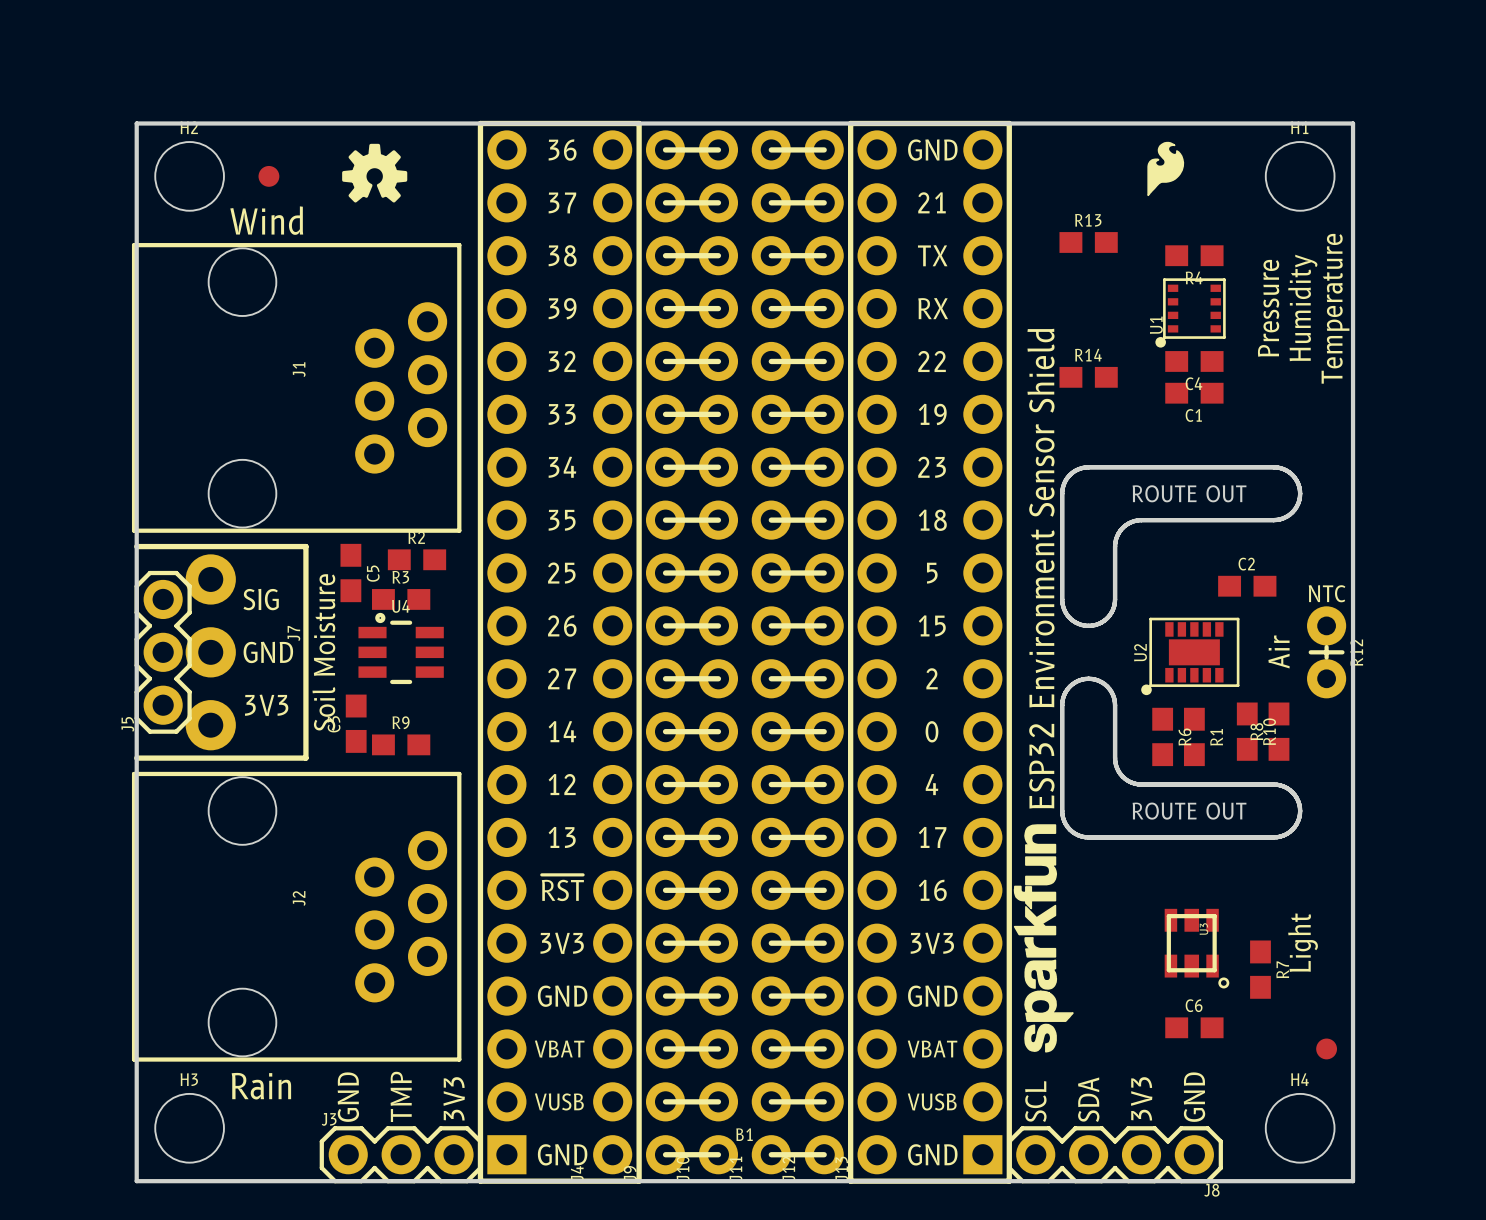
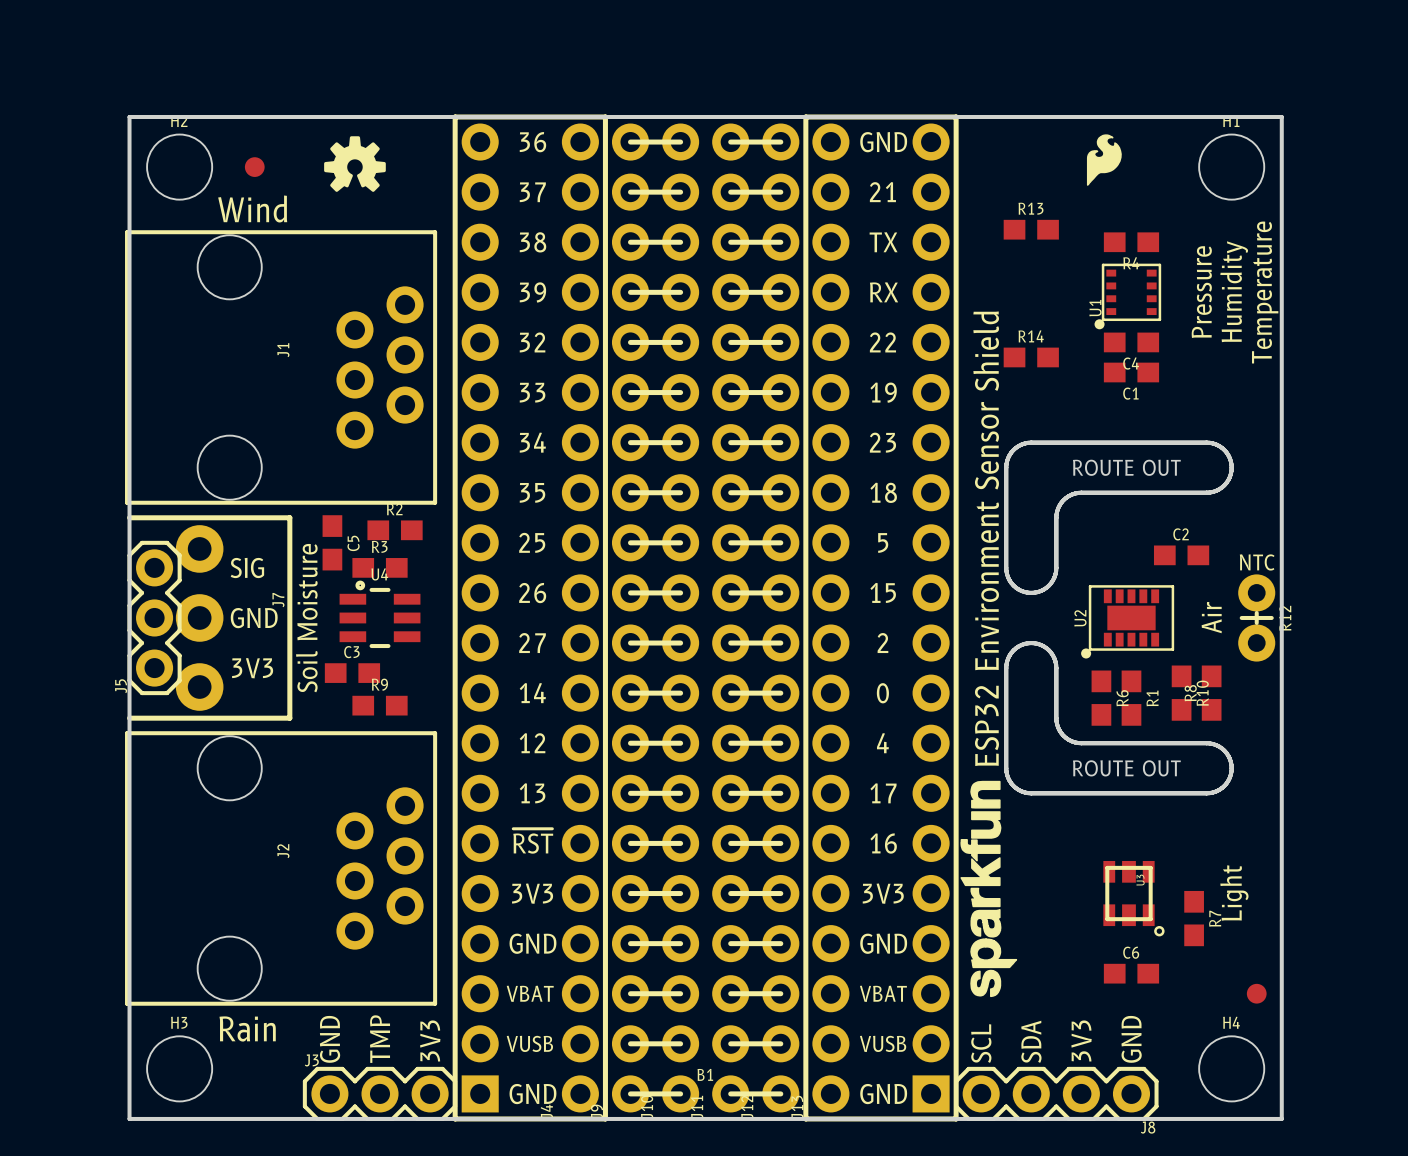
C3 rotation: 0° (356, 723) -> 90° clockwise (352, 673)

